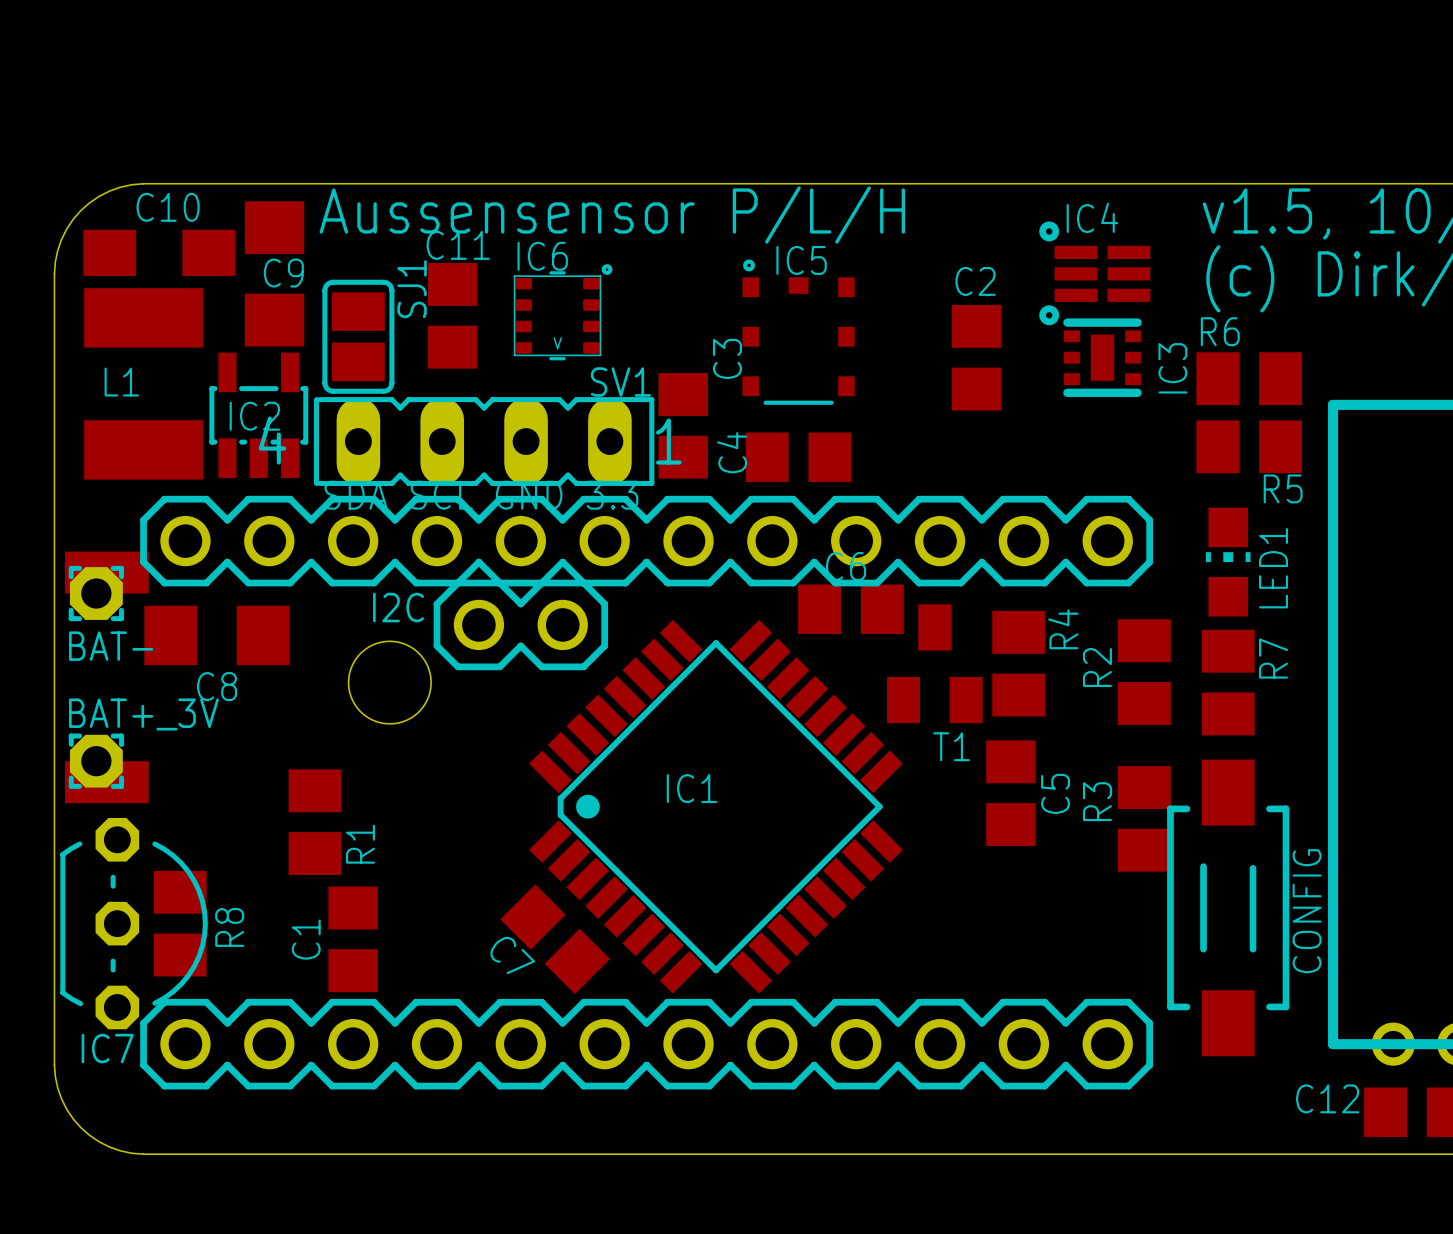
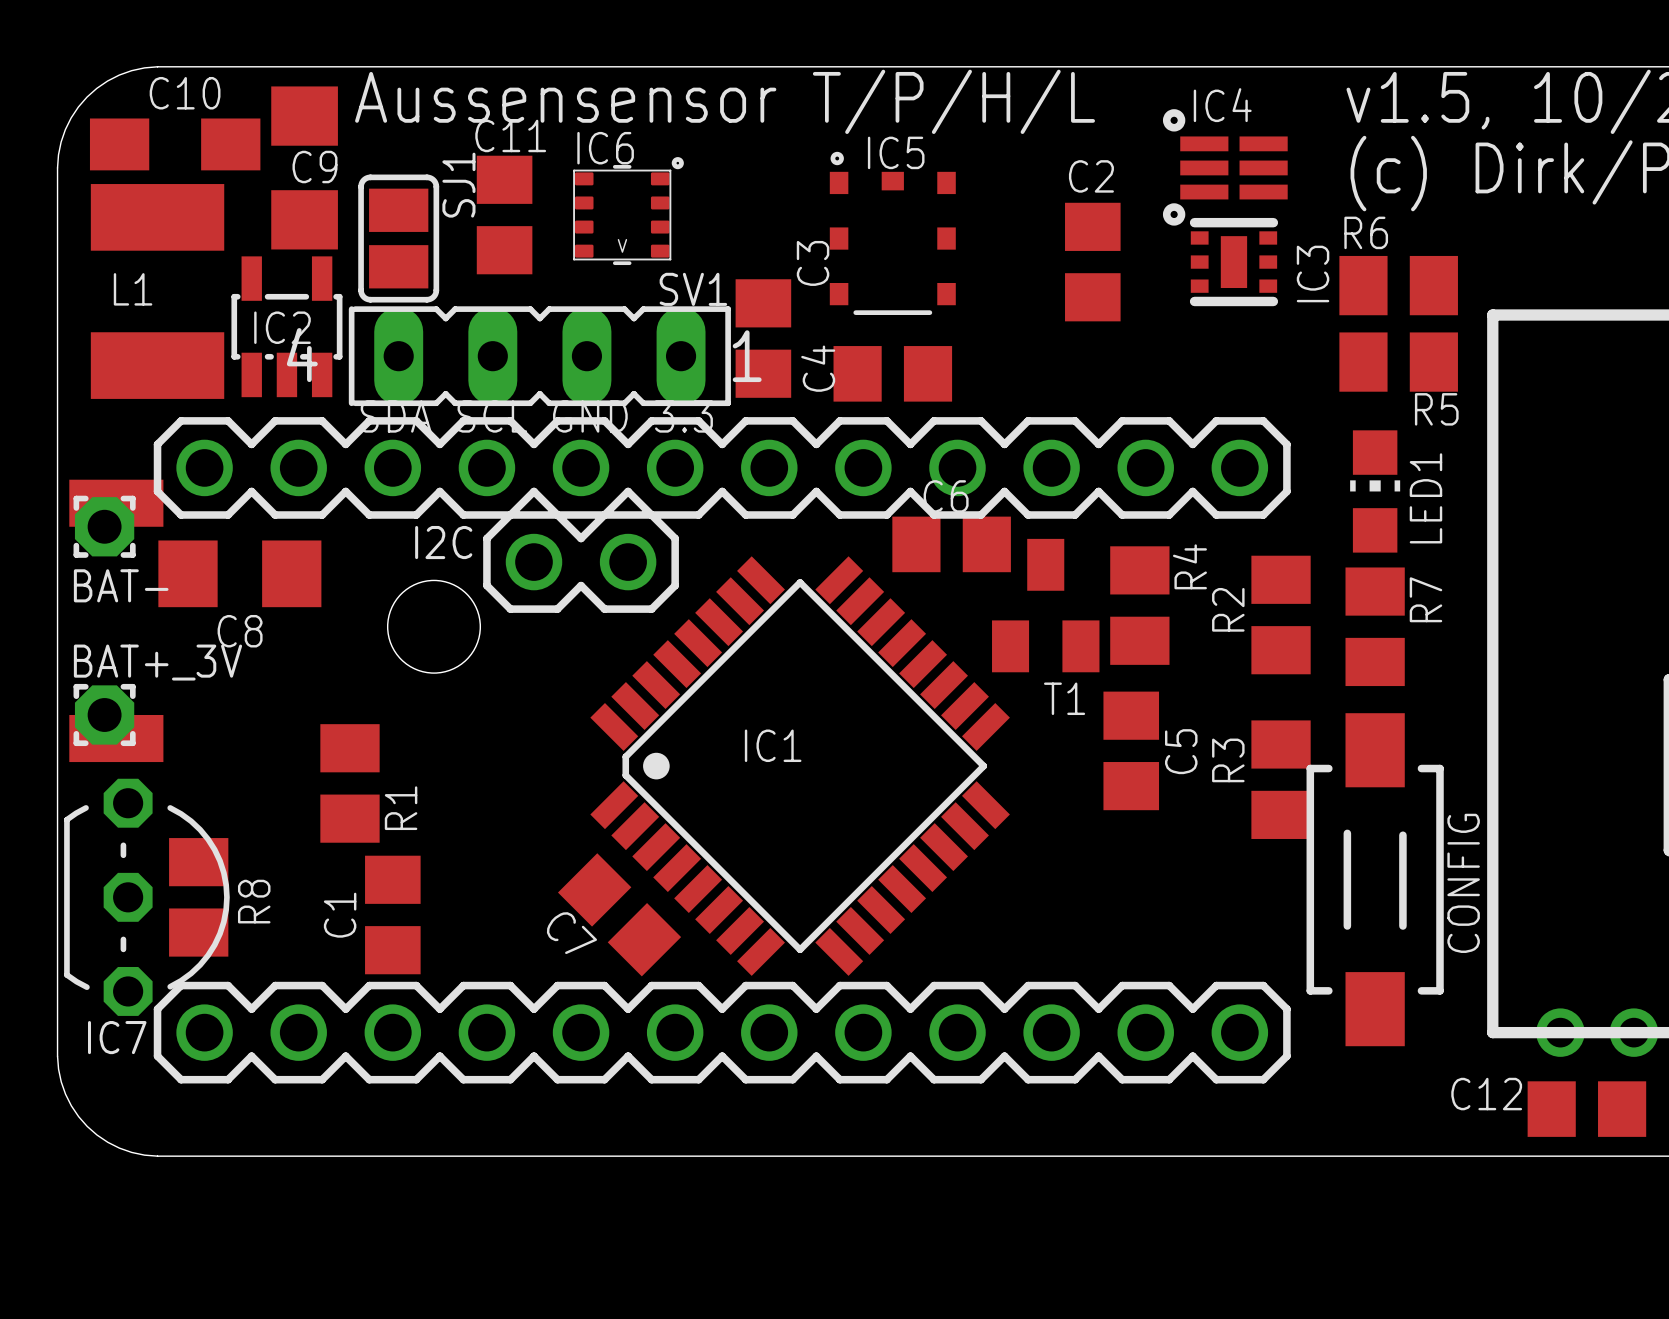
text: Aussensensor P/L/H (612, 214) -> Aussensensor T/P/H/L (725, 101)

